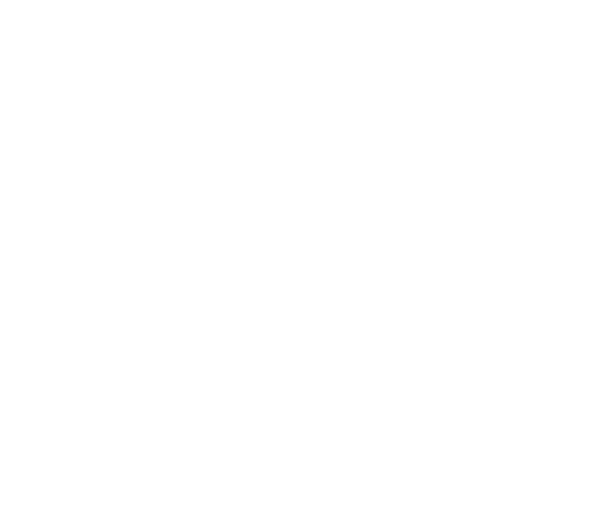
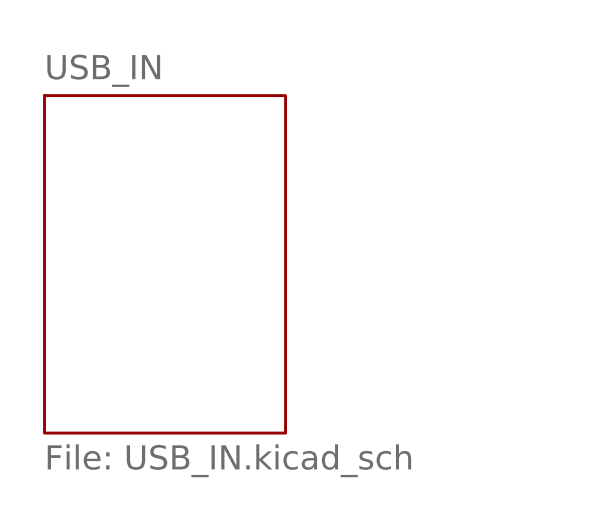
sheet USB_IN: none -> File: USB_IN.kicad_sch (165, 264)

